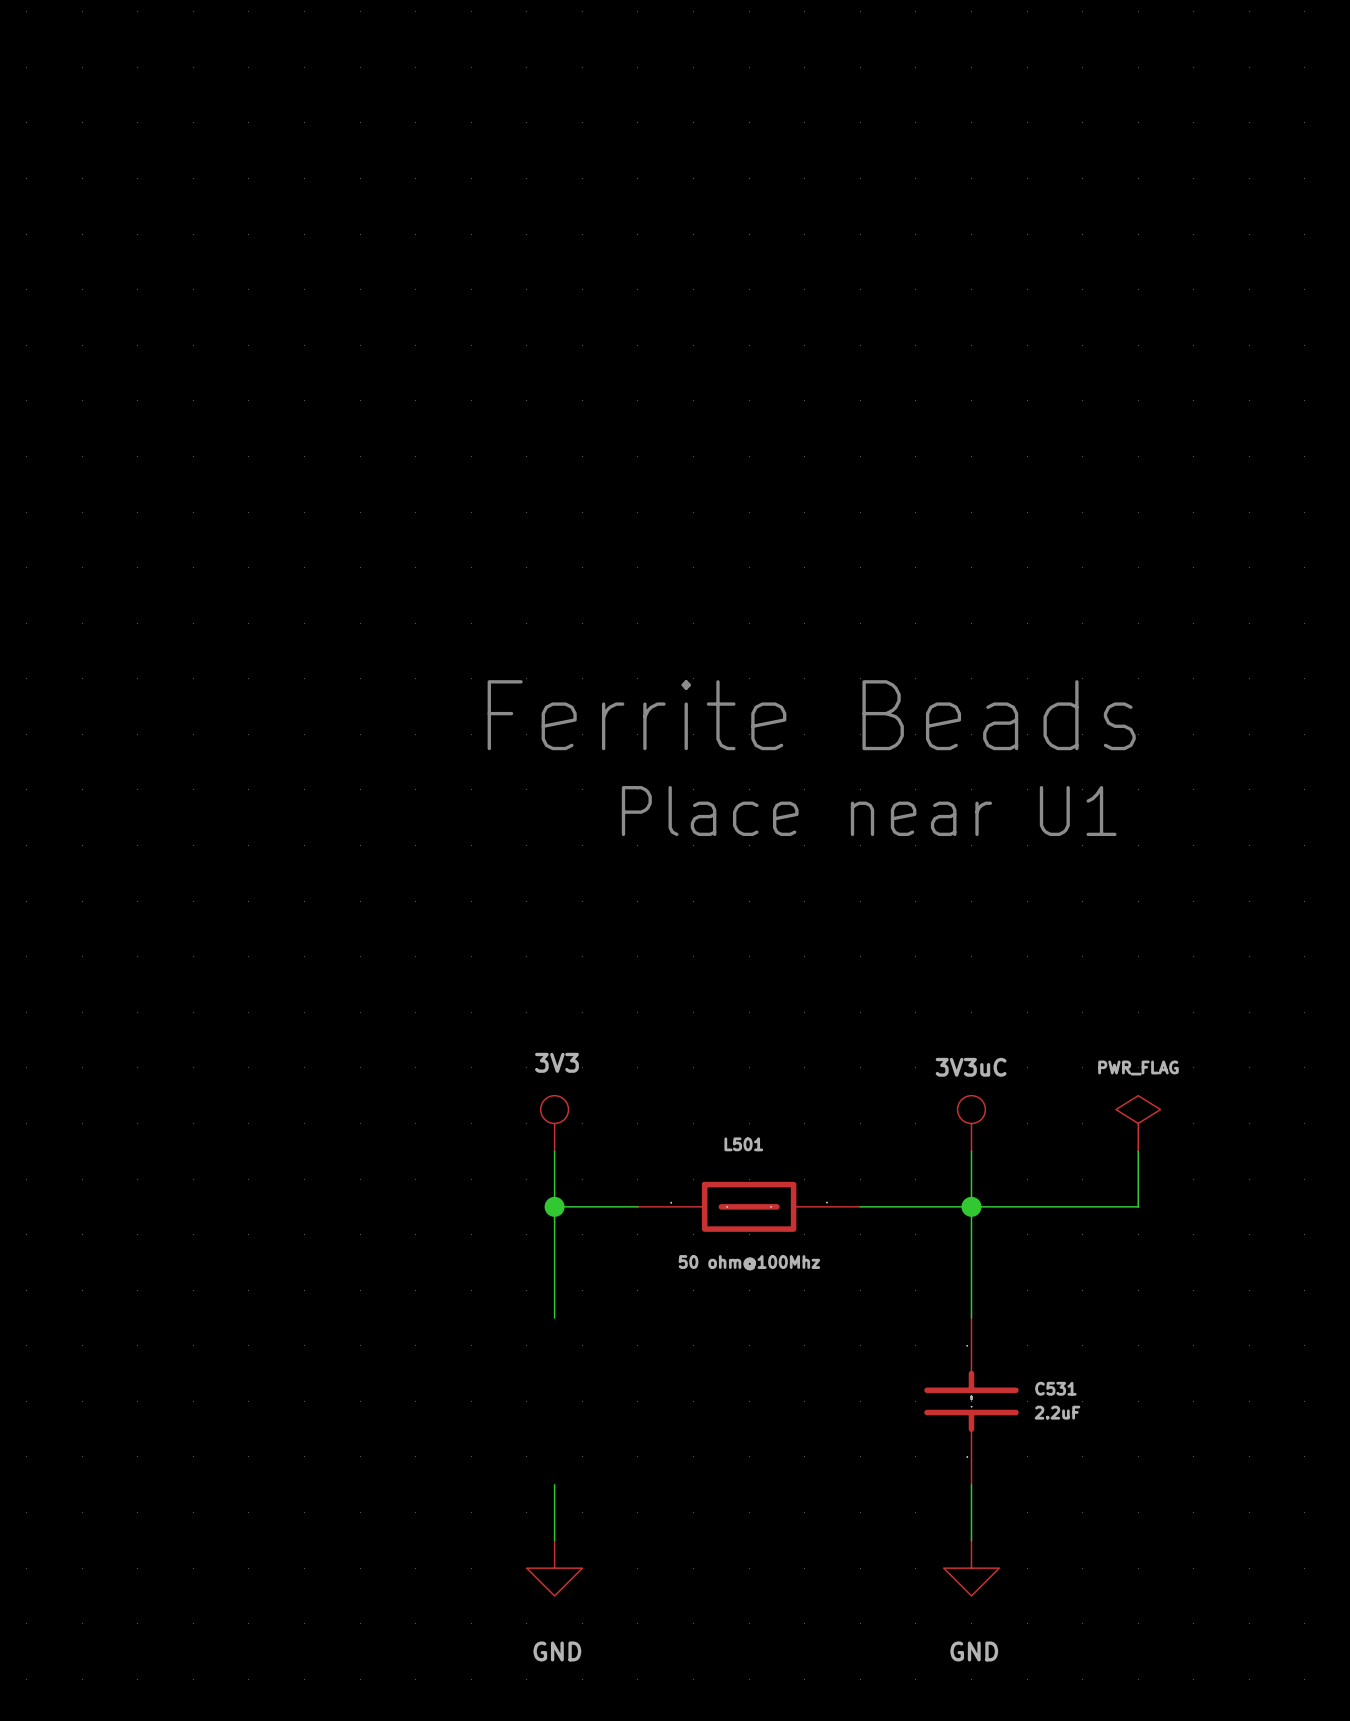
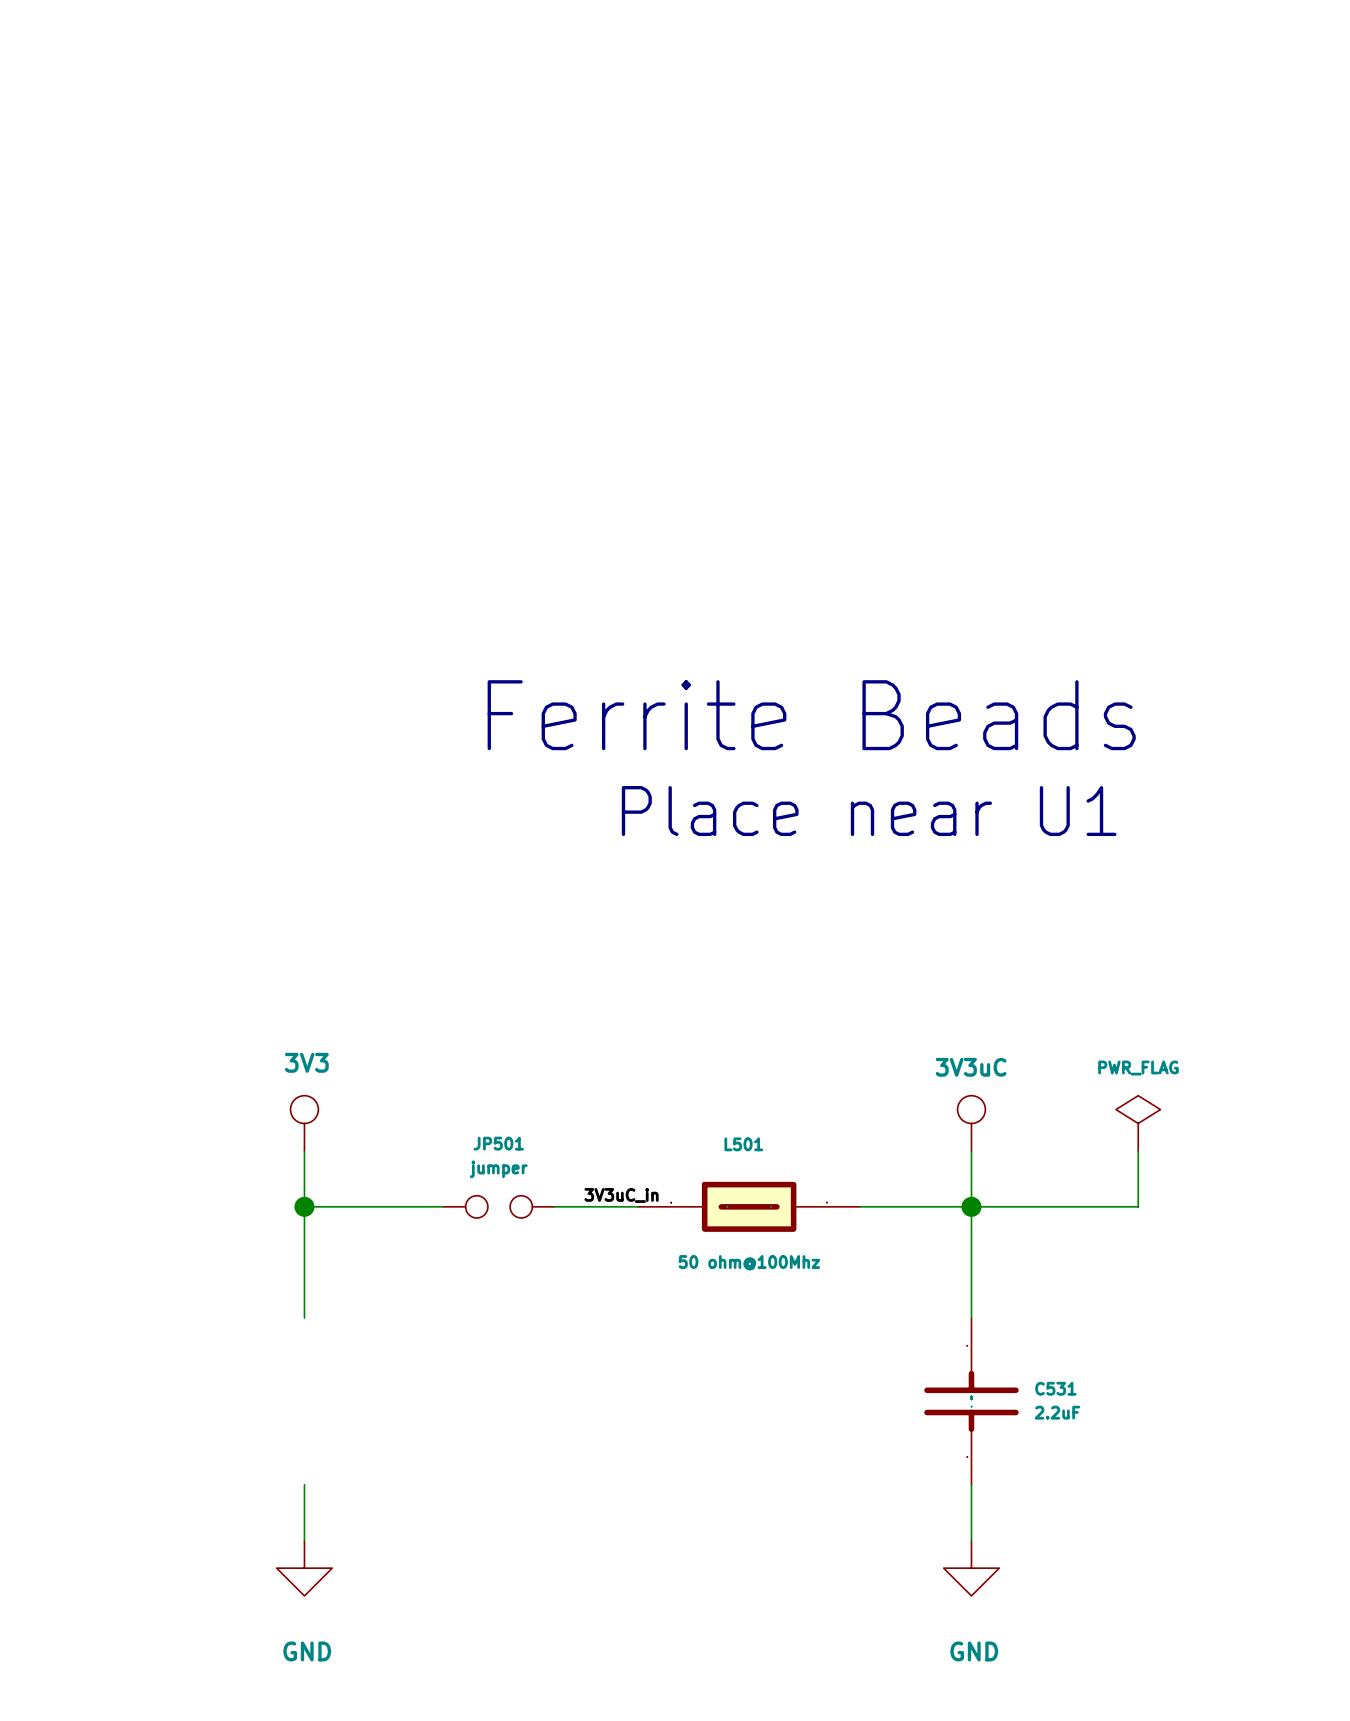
power symbol position: 3V3 (554, 1123) -> 3V3 (304, 1123)
wire: (554, 1151) (554, 1318) -> (304, 1151) (304, 1318)
label: none -> 3V3uC_in (621, 1195)
wire: none -> (304, 1206) (443, 1206)
junction: none -> (304, 1206)
JP501: none -> jumper (499, 1206)
junction: (554, 1206) -> none
wire: (554, 1484) (554, 1540) -> (304, 1484) (304, 1540)
power symbol position: GND (554, 1568) -> GND (304, 1568)

